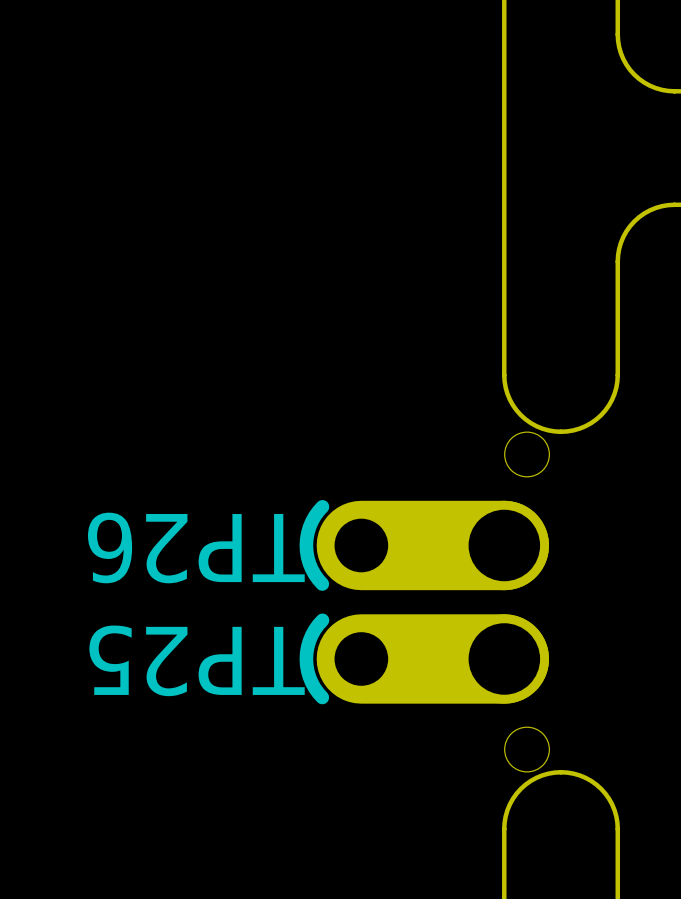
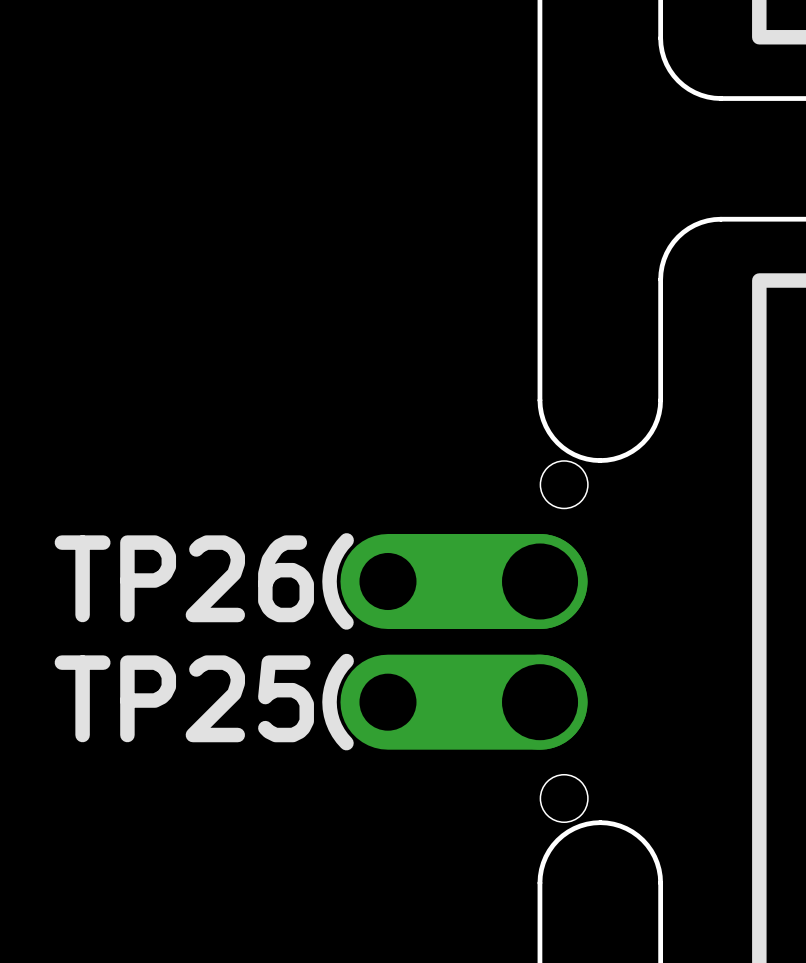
TP26 name rotation: 0° (196, 547) -> 180° (184, 578)
TP25 name rotation: 0° (197, 660) -> 180° (184, 698)

